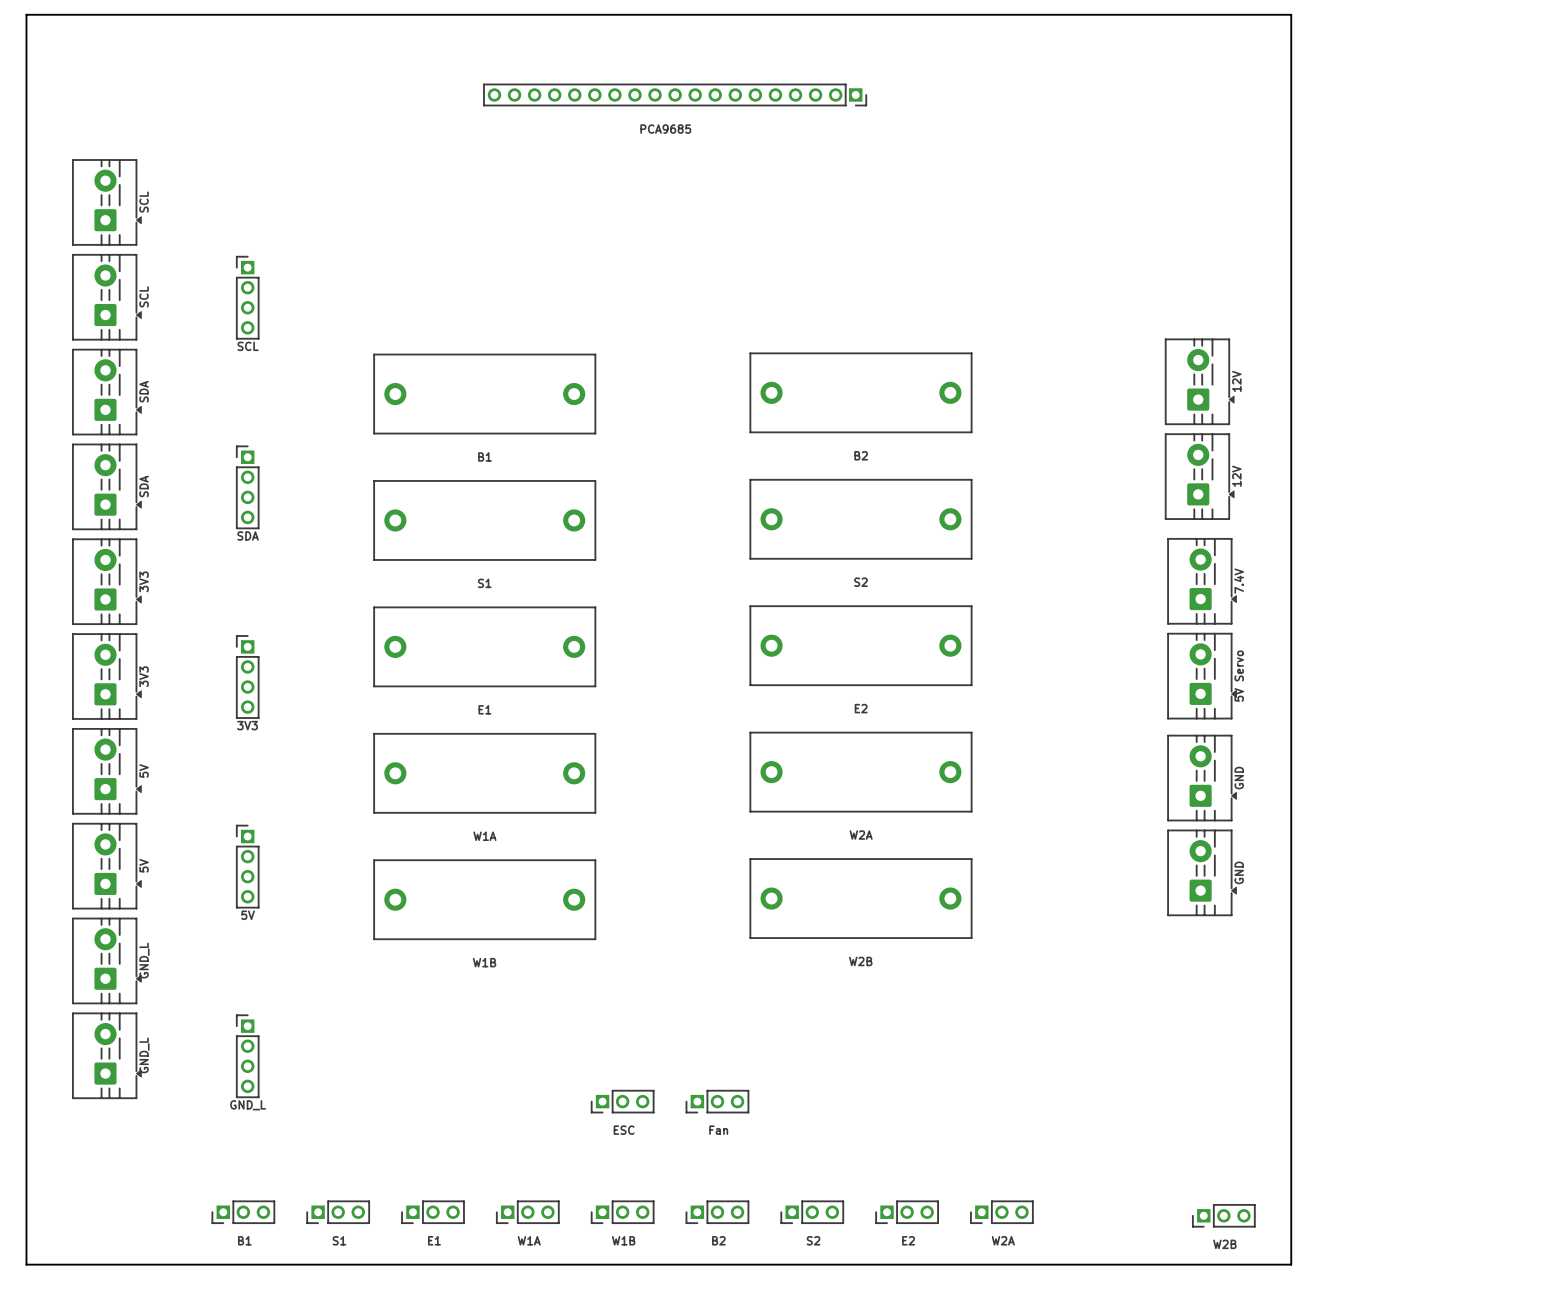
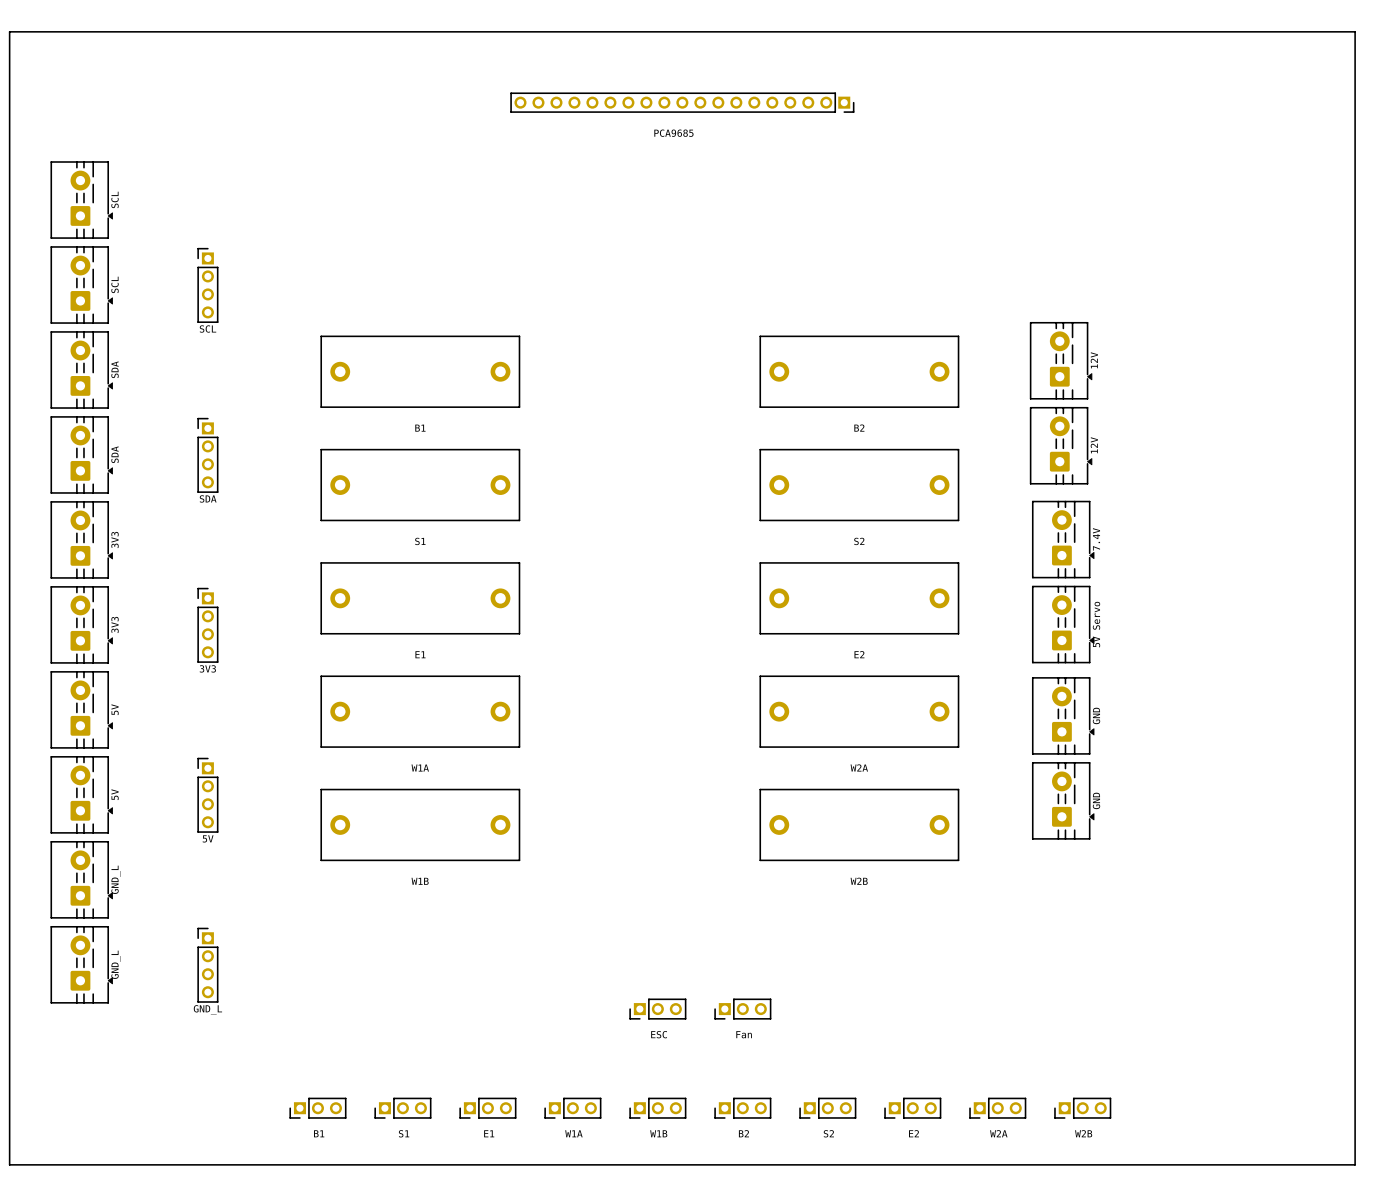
board edge: (1291, 14) (1291, 1264) (26, 1264) -> (1143, 31) (1355, 31) (1355, 1164) (9, 1164) (9, 1151)
part position: (675, 94) -> (682, 102)
part position: (860, 392) -> (859, 371)
part position: (860, 519) -> (859, 485)
part position: (860, 645) -> (859, 598)
part position: (860, 772) -> (859, 711)
part position: (860, 898) -> (859, 824)
part position: (622, 1101) -> (657, 1009)
part position: (717, 1101) -> (742, 1009)
part position: (243, 1212) -> (317, 1108)
part position: (338, 1212) -> (402, 1108)
part position: (433, 1212) -> (487, 1108)
part position: (527, 1212) -> (572, 1108)
part position: (622, 1212) -> (657, 1108)
part position: (717, 1212) -> (742, 1108)
part position: (812, 1212) -> (827, 1108)
part position: (907, 1212) -> (912, 1108)
part position: (1001, 1212) -> (997, 1108)

